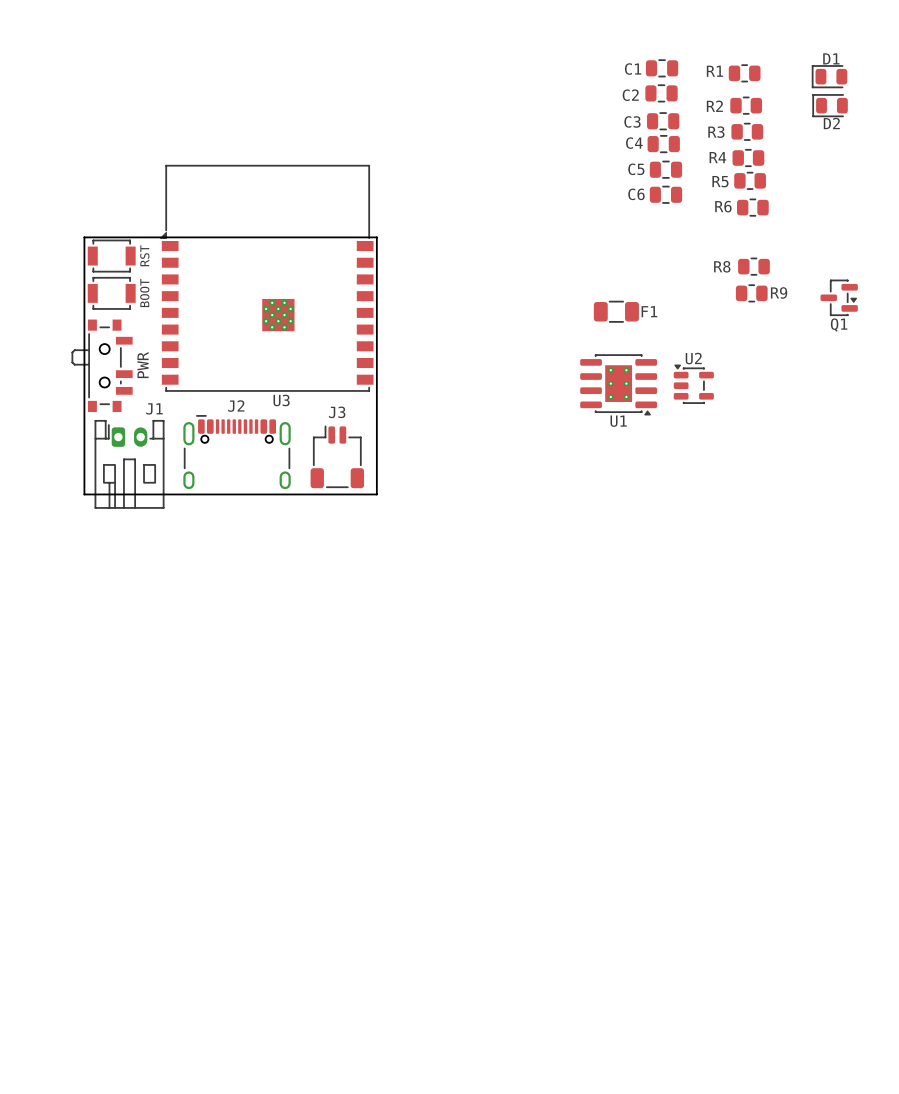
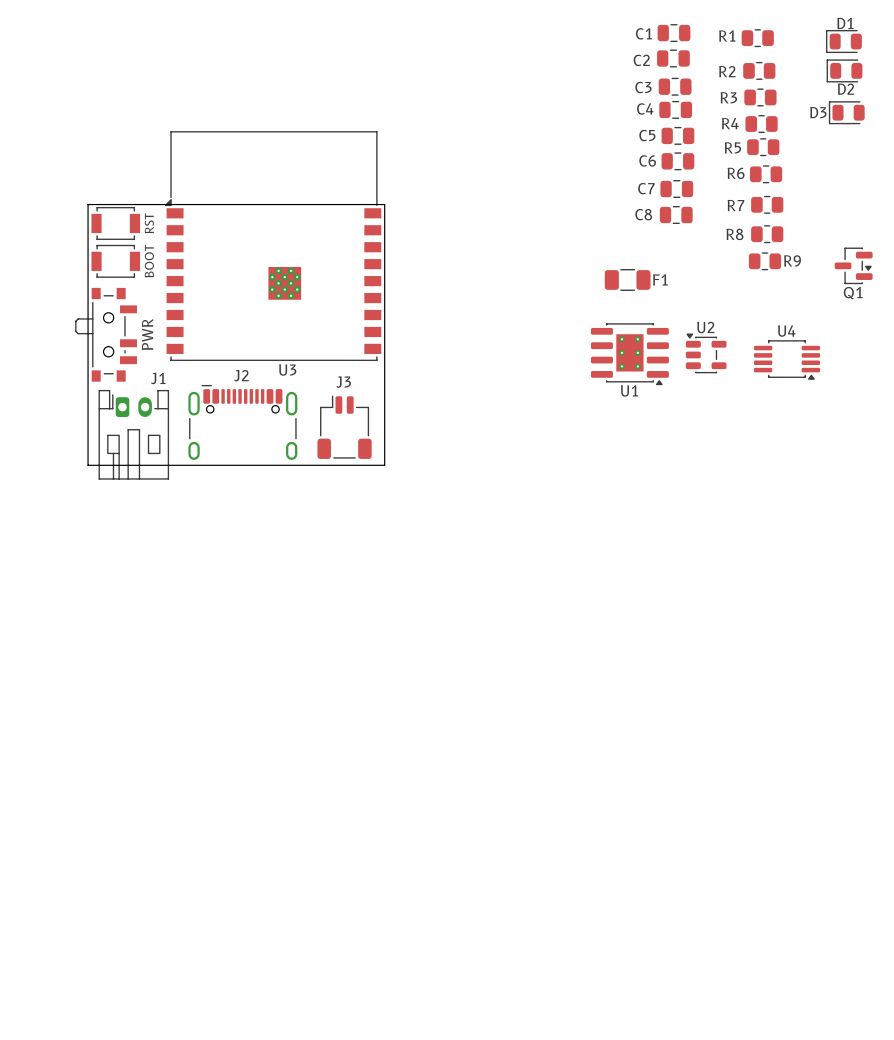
D3: none -> (846, 112)
C7: none -> (676, 189)
R7: none -> (767, 204)
C8: none -> (676, 214)
U4: none -> (786, 359)

